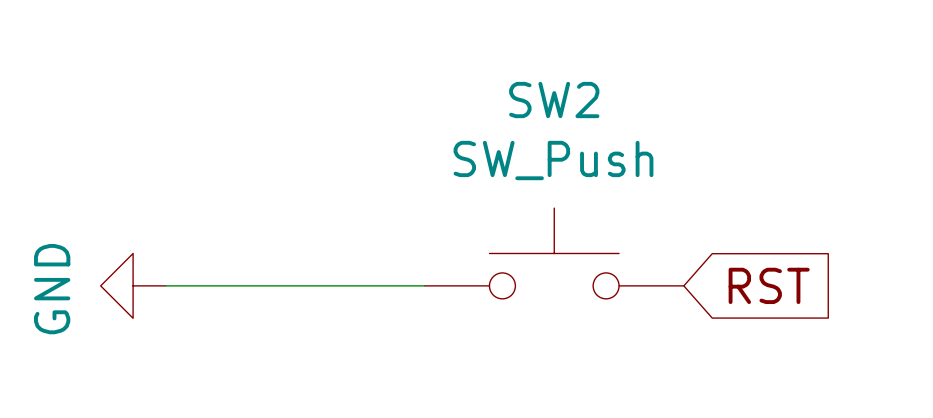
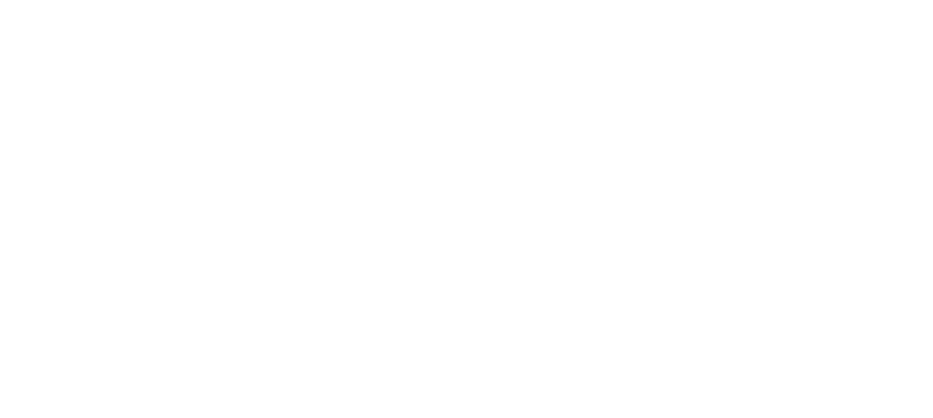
SW2: SW_Push (554, 253) -> none
power symbol: GND (133, 285) -> none
wire: (165, 285) (424, 285) -> none
global label: RST (769, 285) -> none

